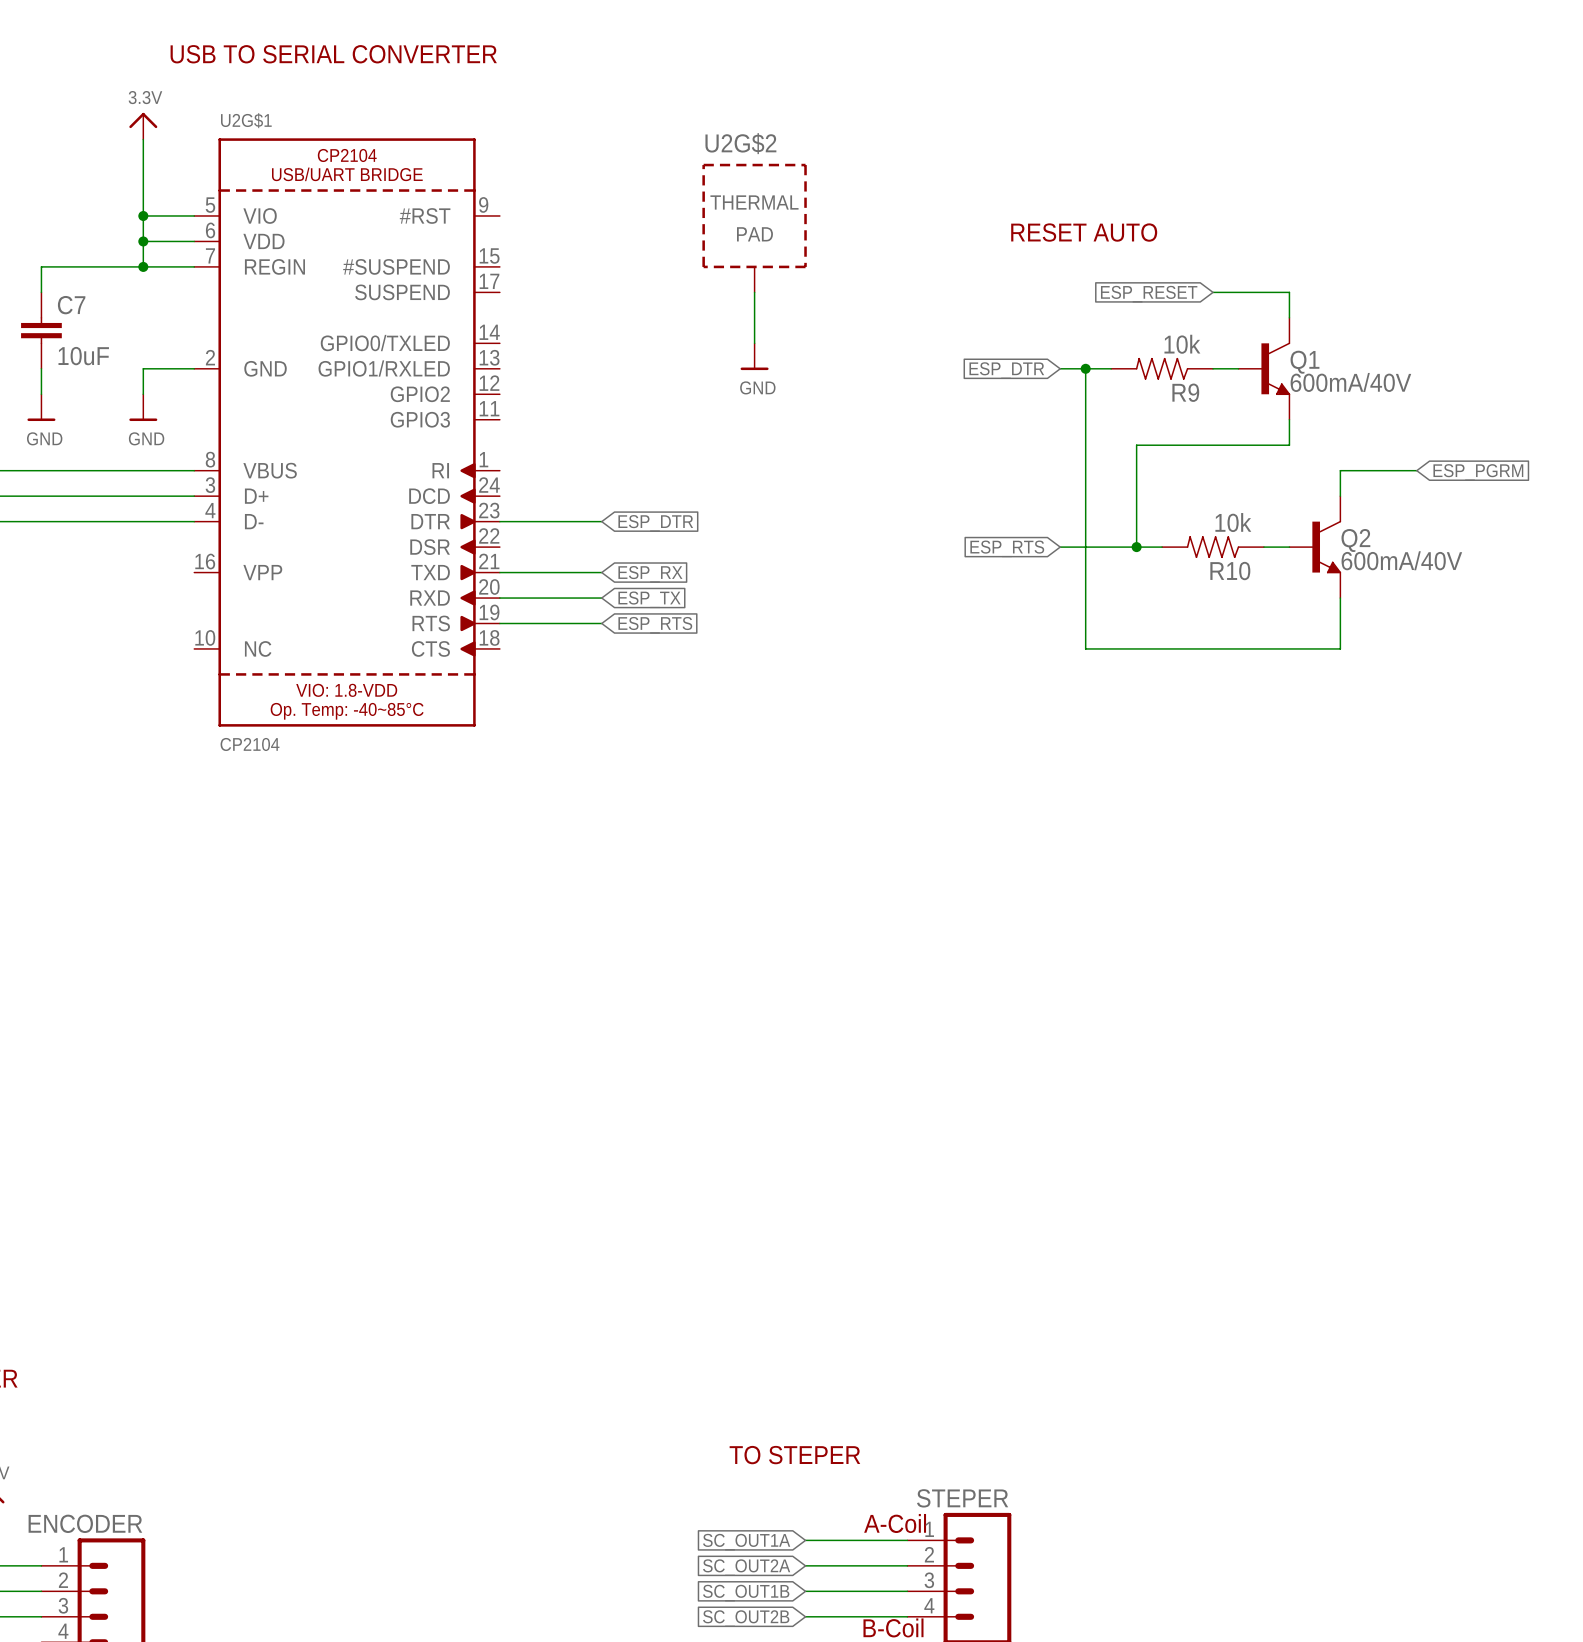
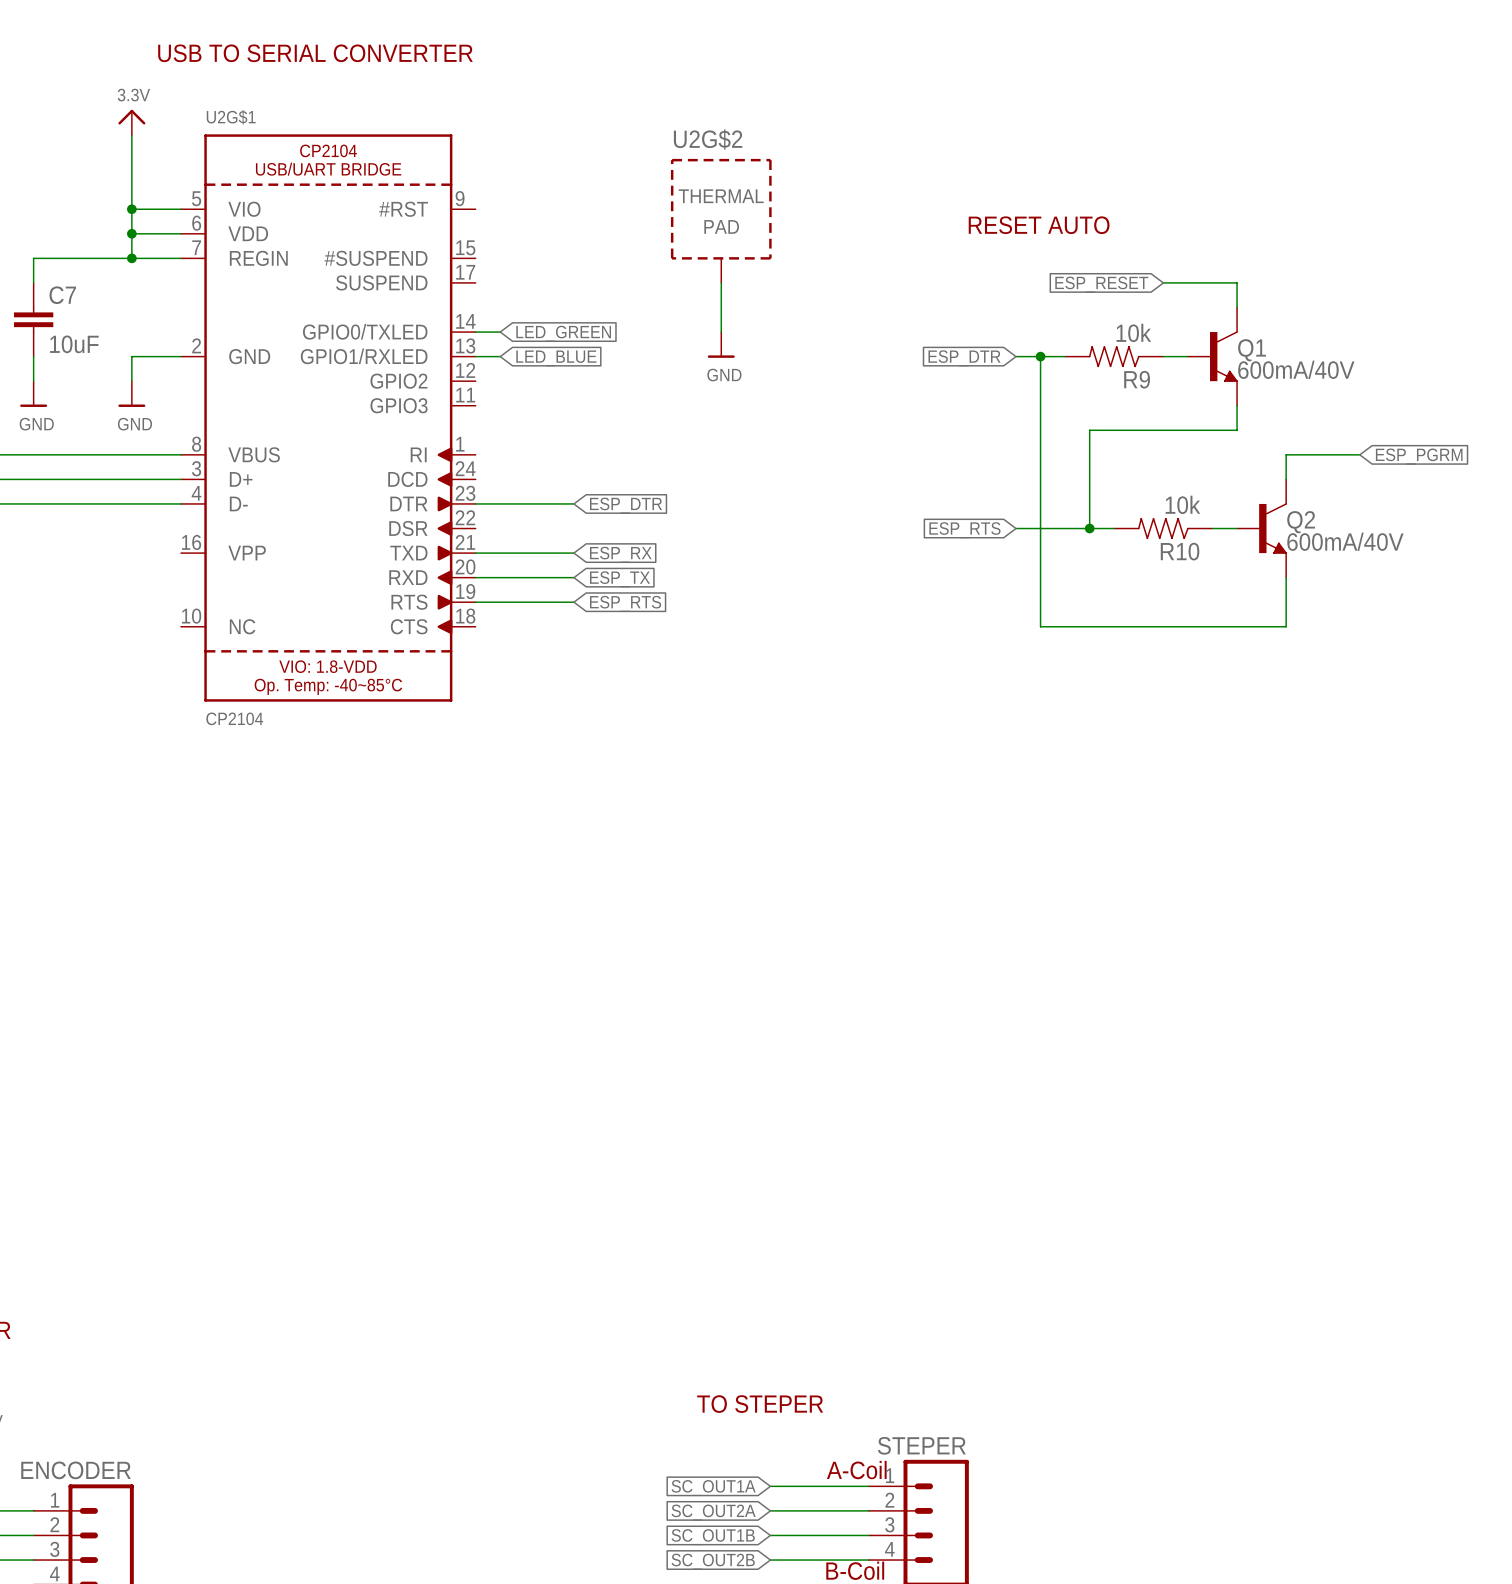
wire: none -> (475, 332) (500, 332)
global label: none -> LED_GREEN (563, 333)
wire: none -> (475, 356) (500, 356)
global label: none -> LED_BLUE (556, 358)

